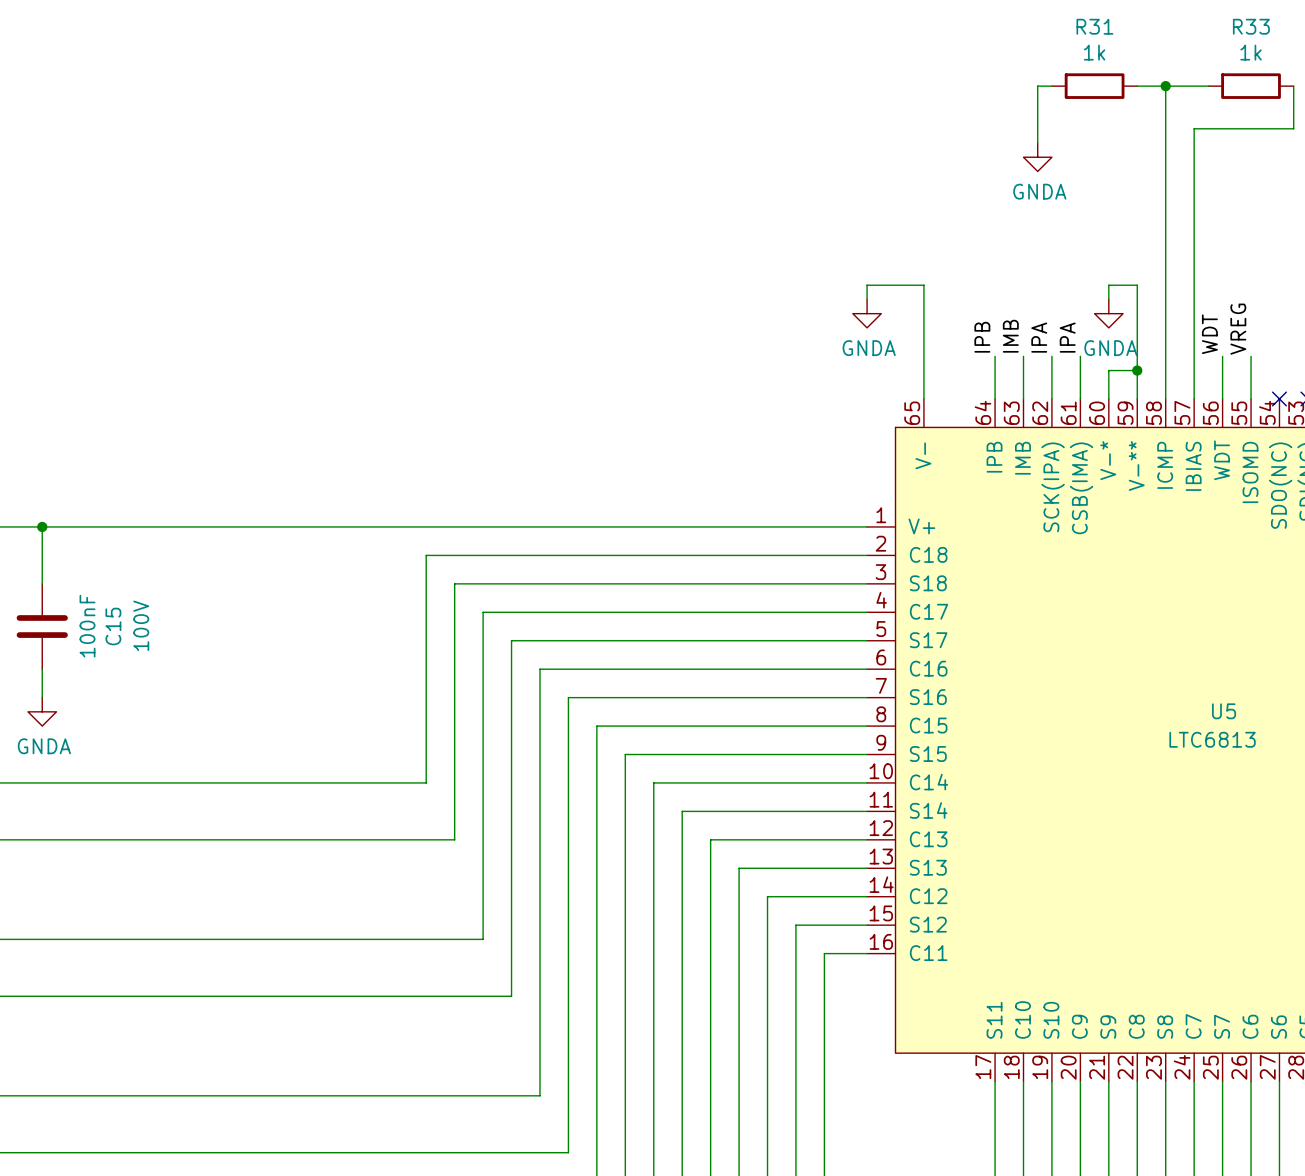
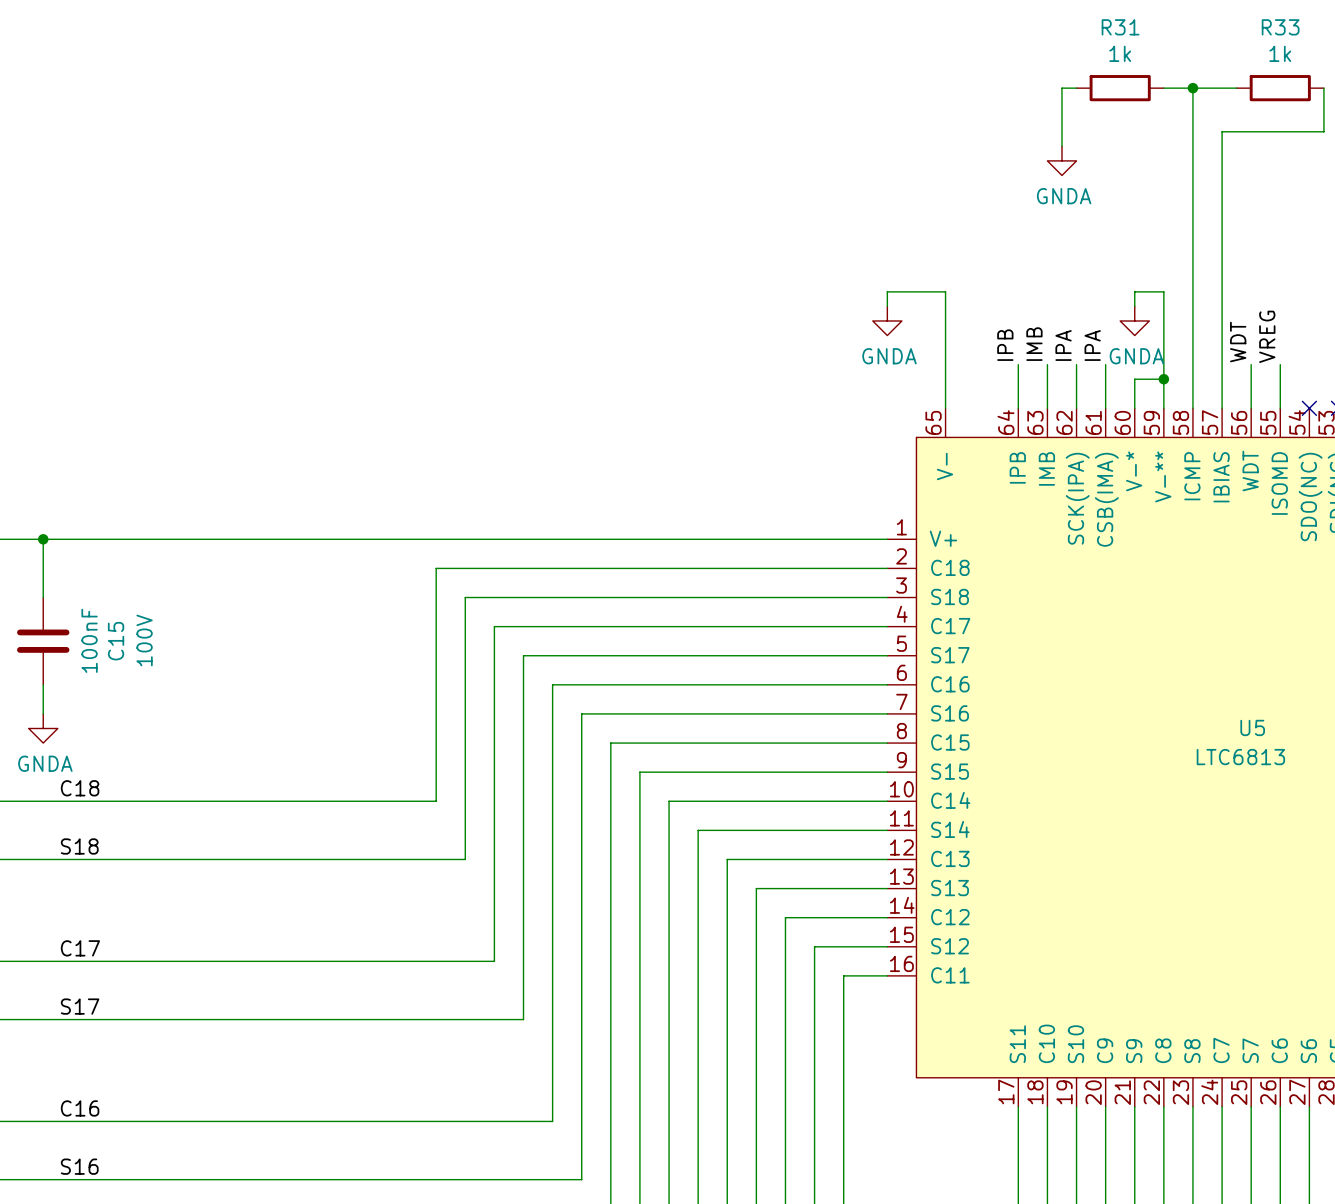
label: none -> C18 (80, 788)
label: none -> S18 (79, 846)
label: none -> C17 (80, 948)
label: none -> S17 (80, 1006)
label: none -> C16 (80, 1108)
label: none -> S16 (79, 1166)

